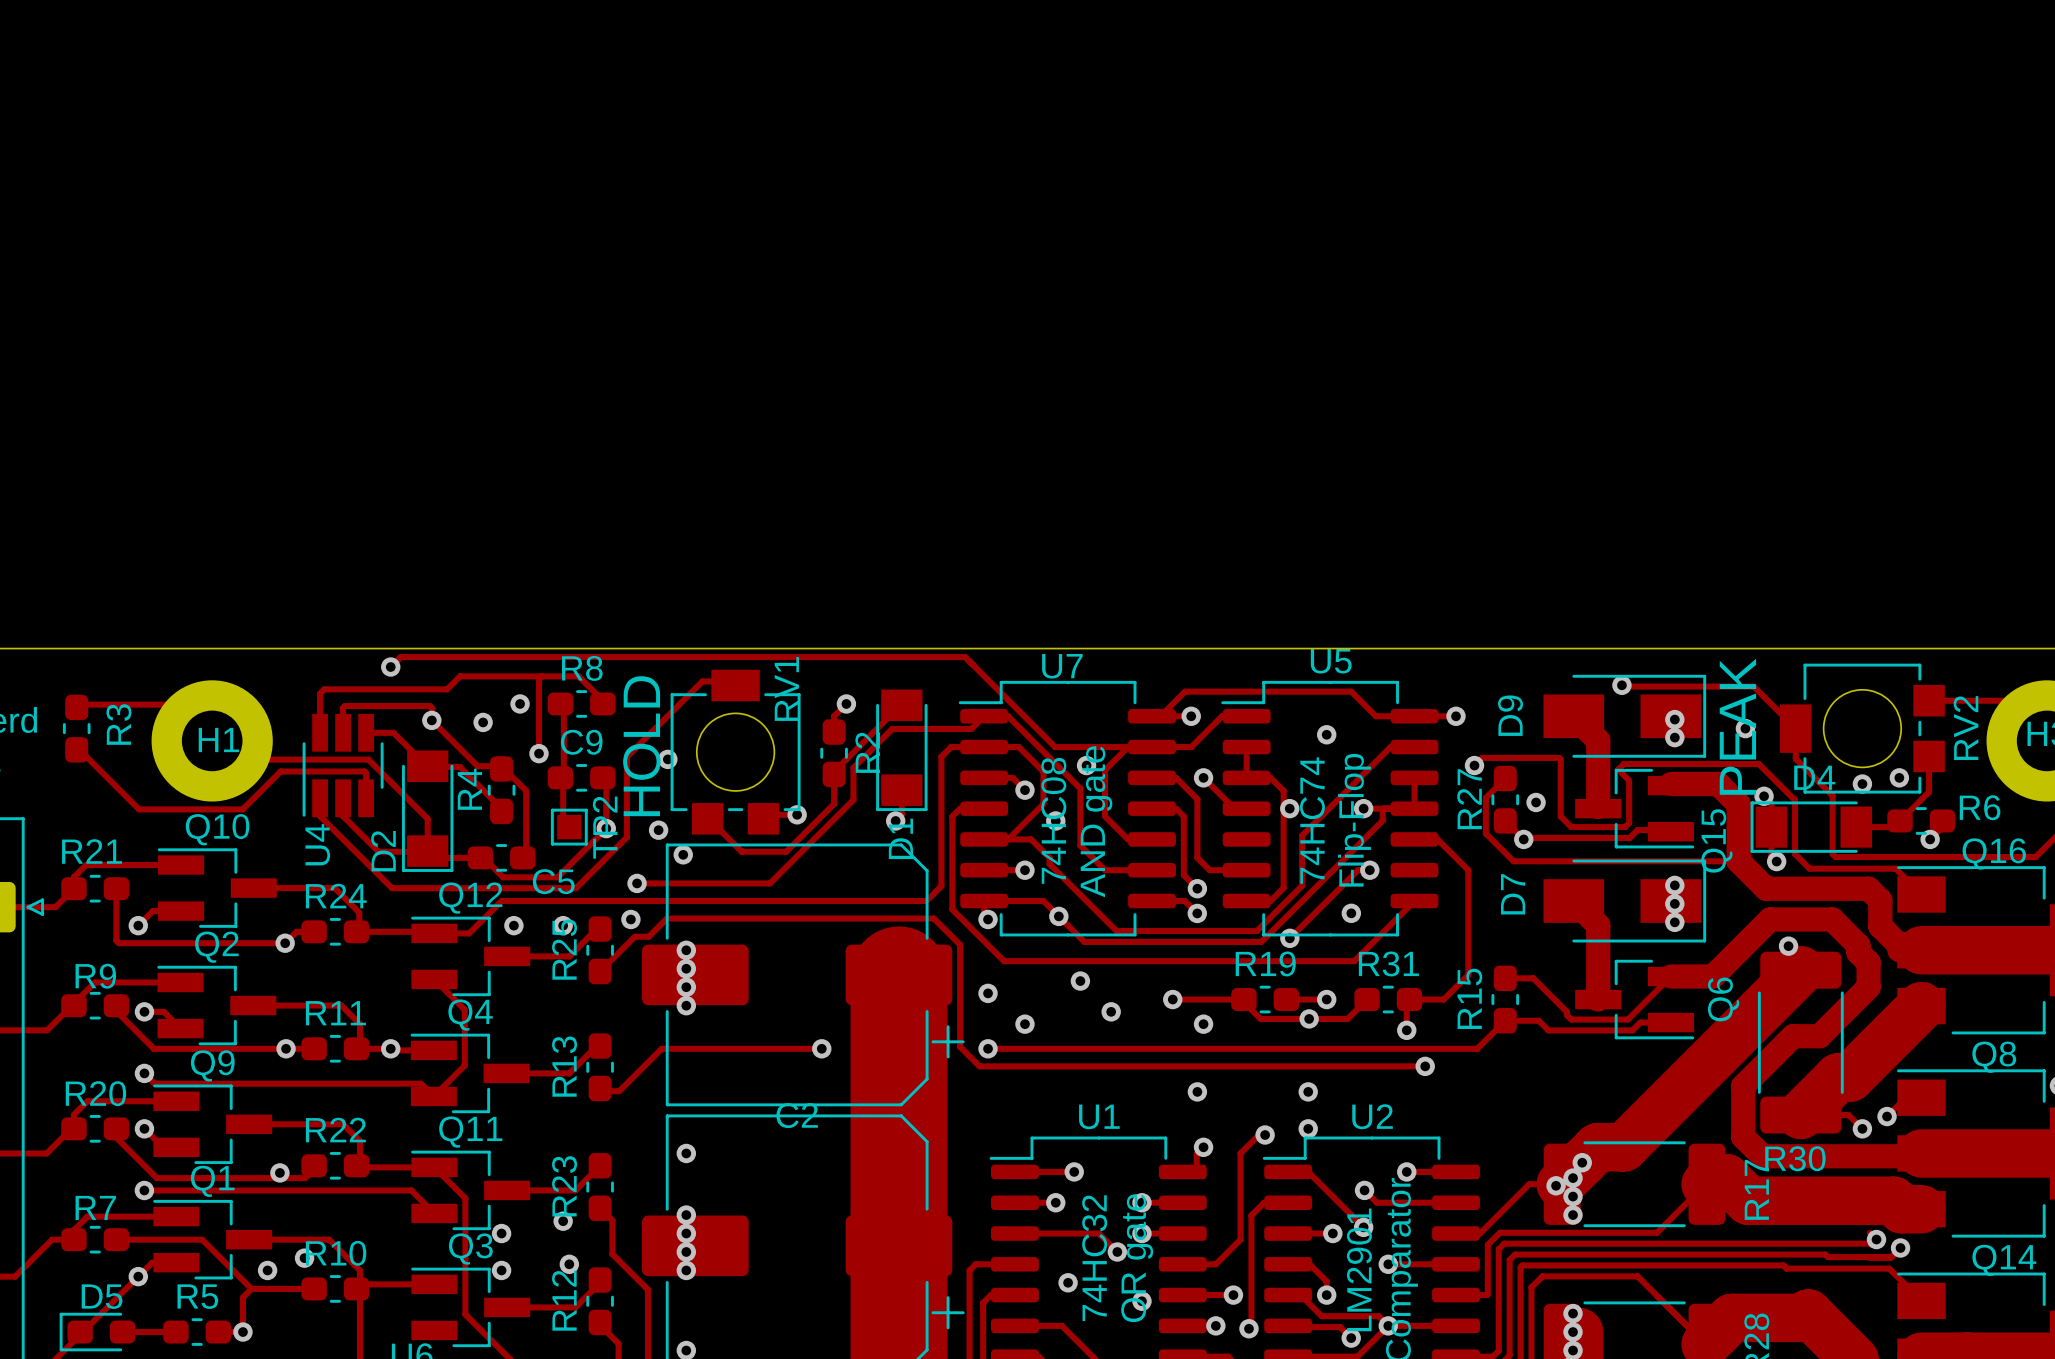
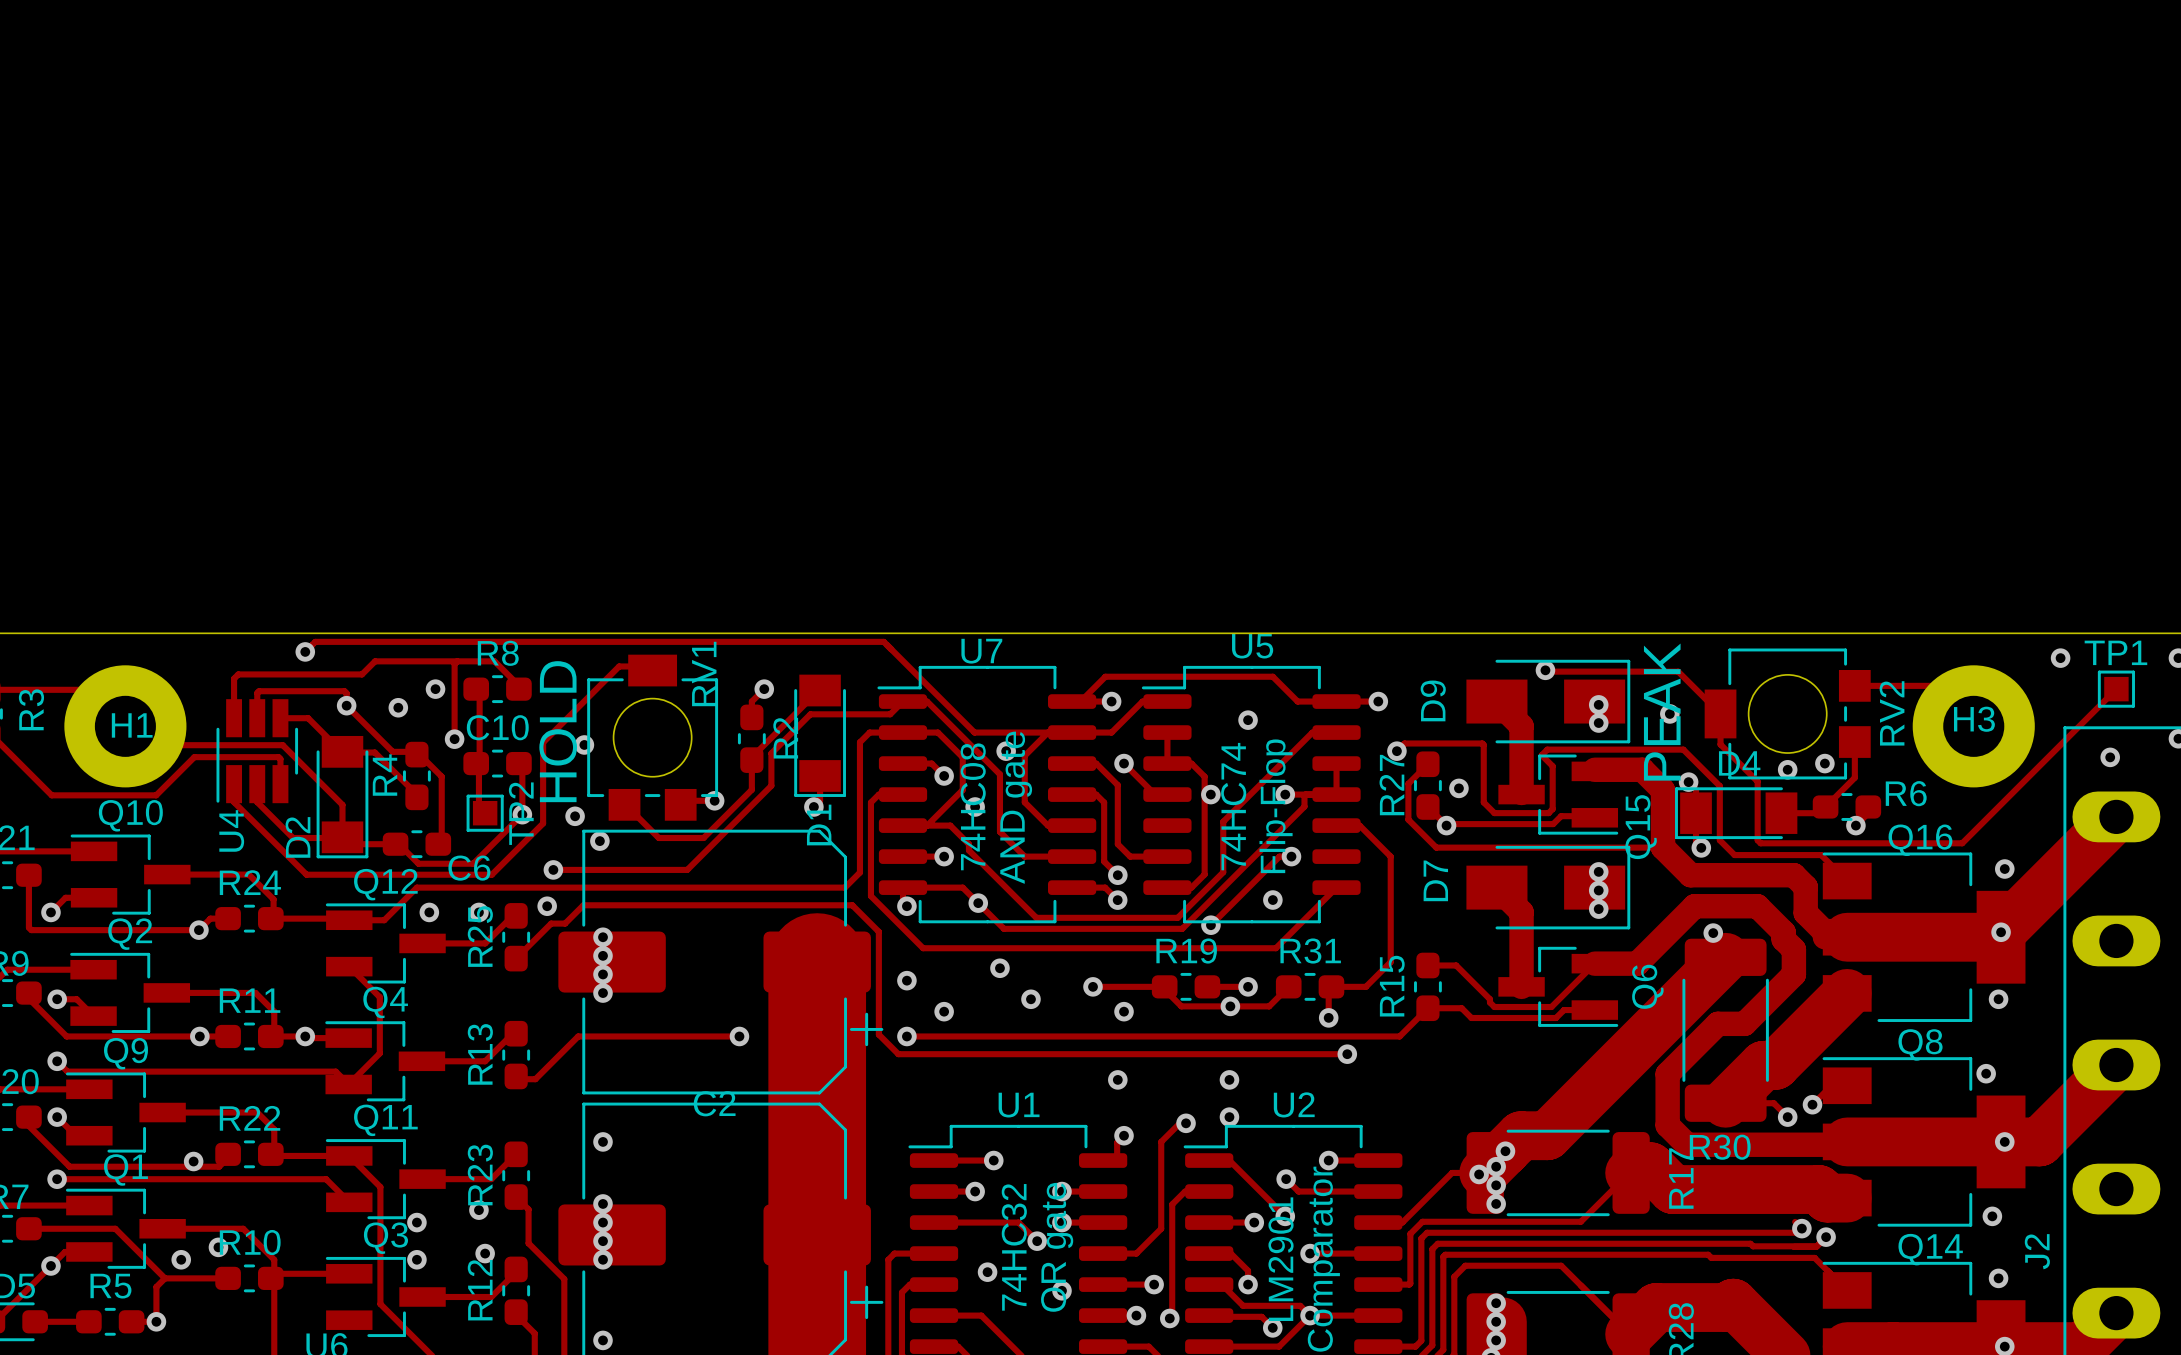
C9 name: C9 (581, 742) -> C10 (497, 727)
C5 name: C5 (553, 881) -> C6 (469, 868)

